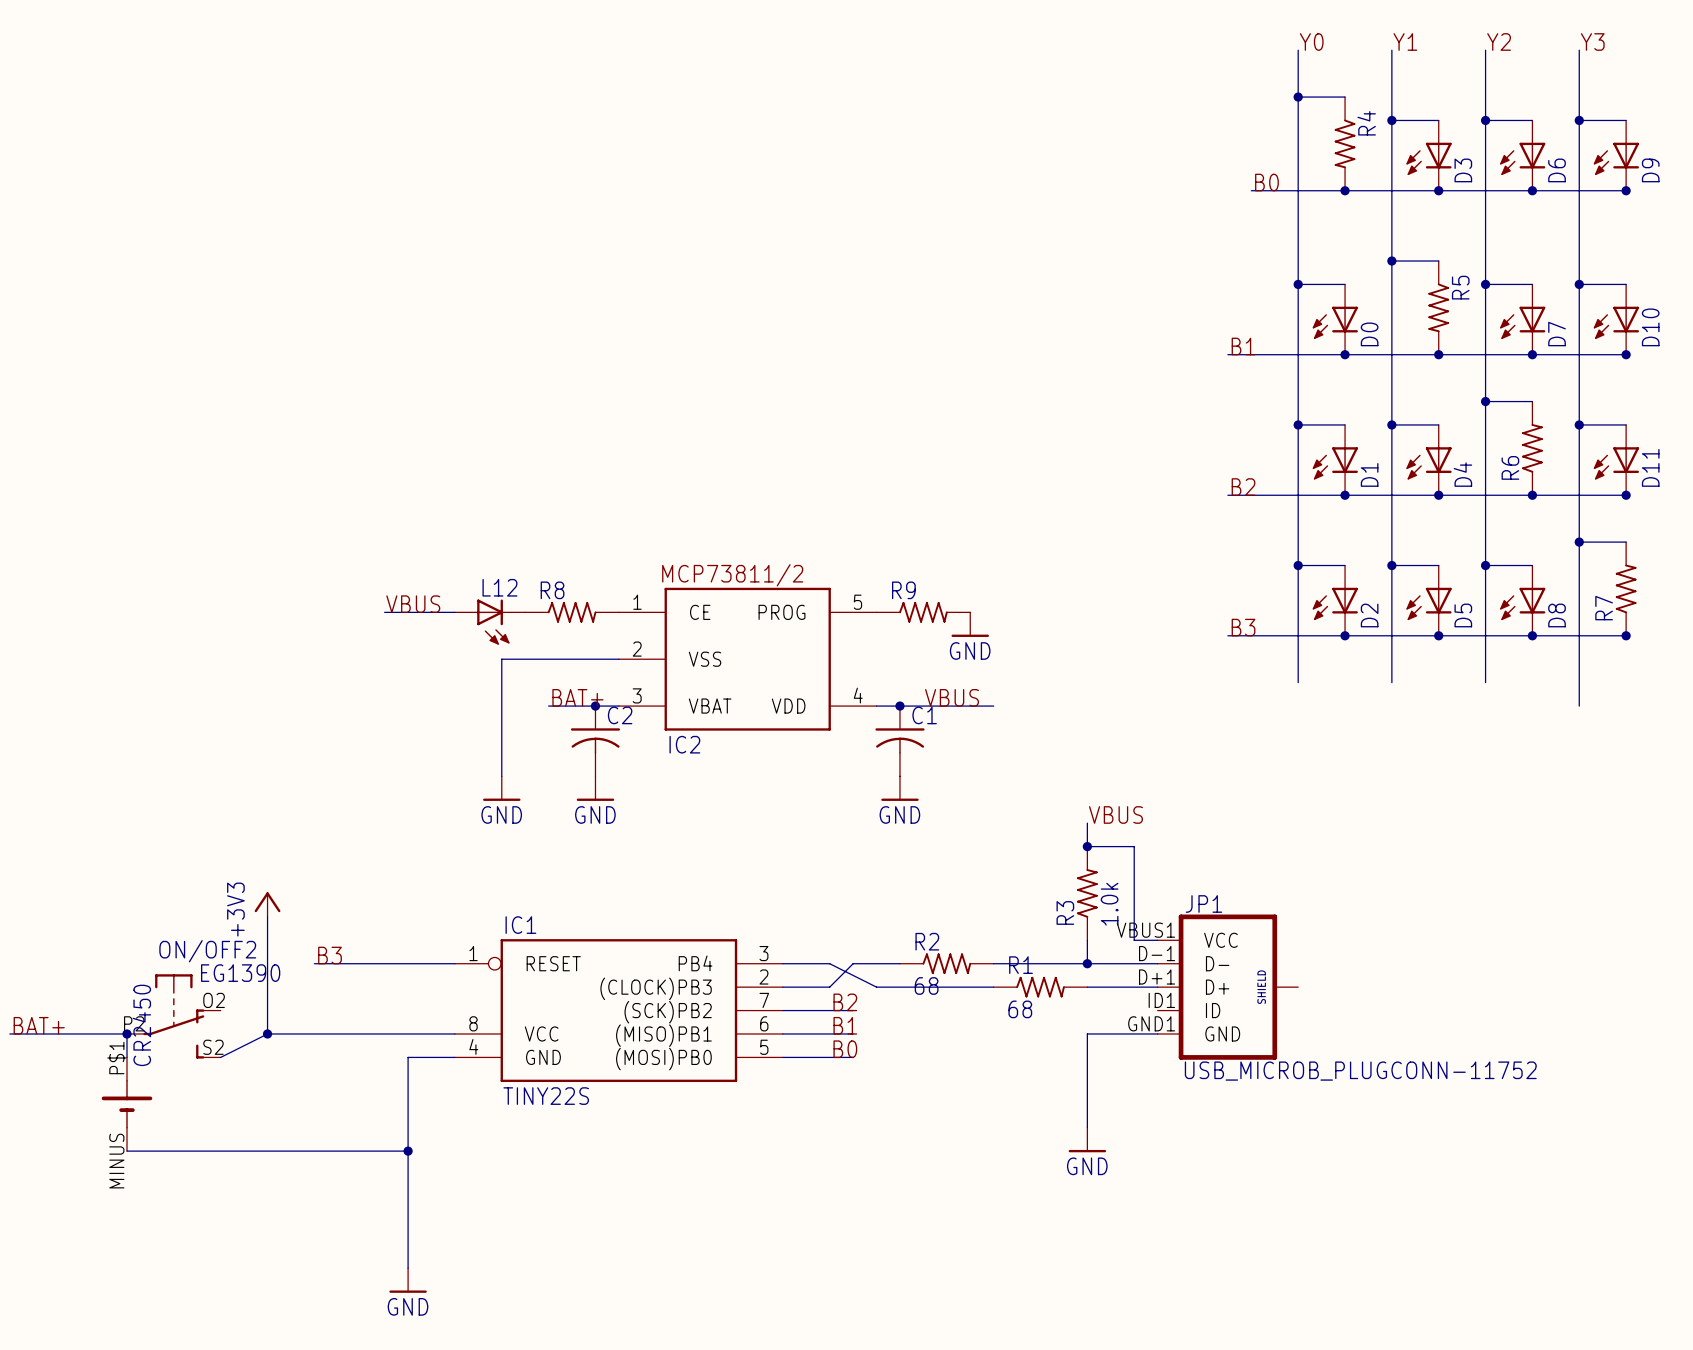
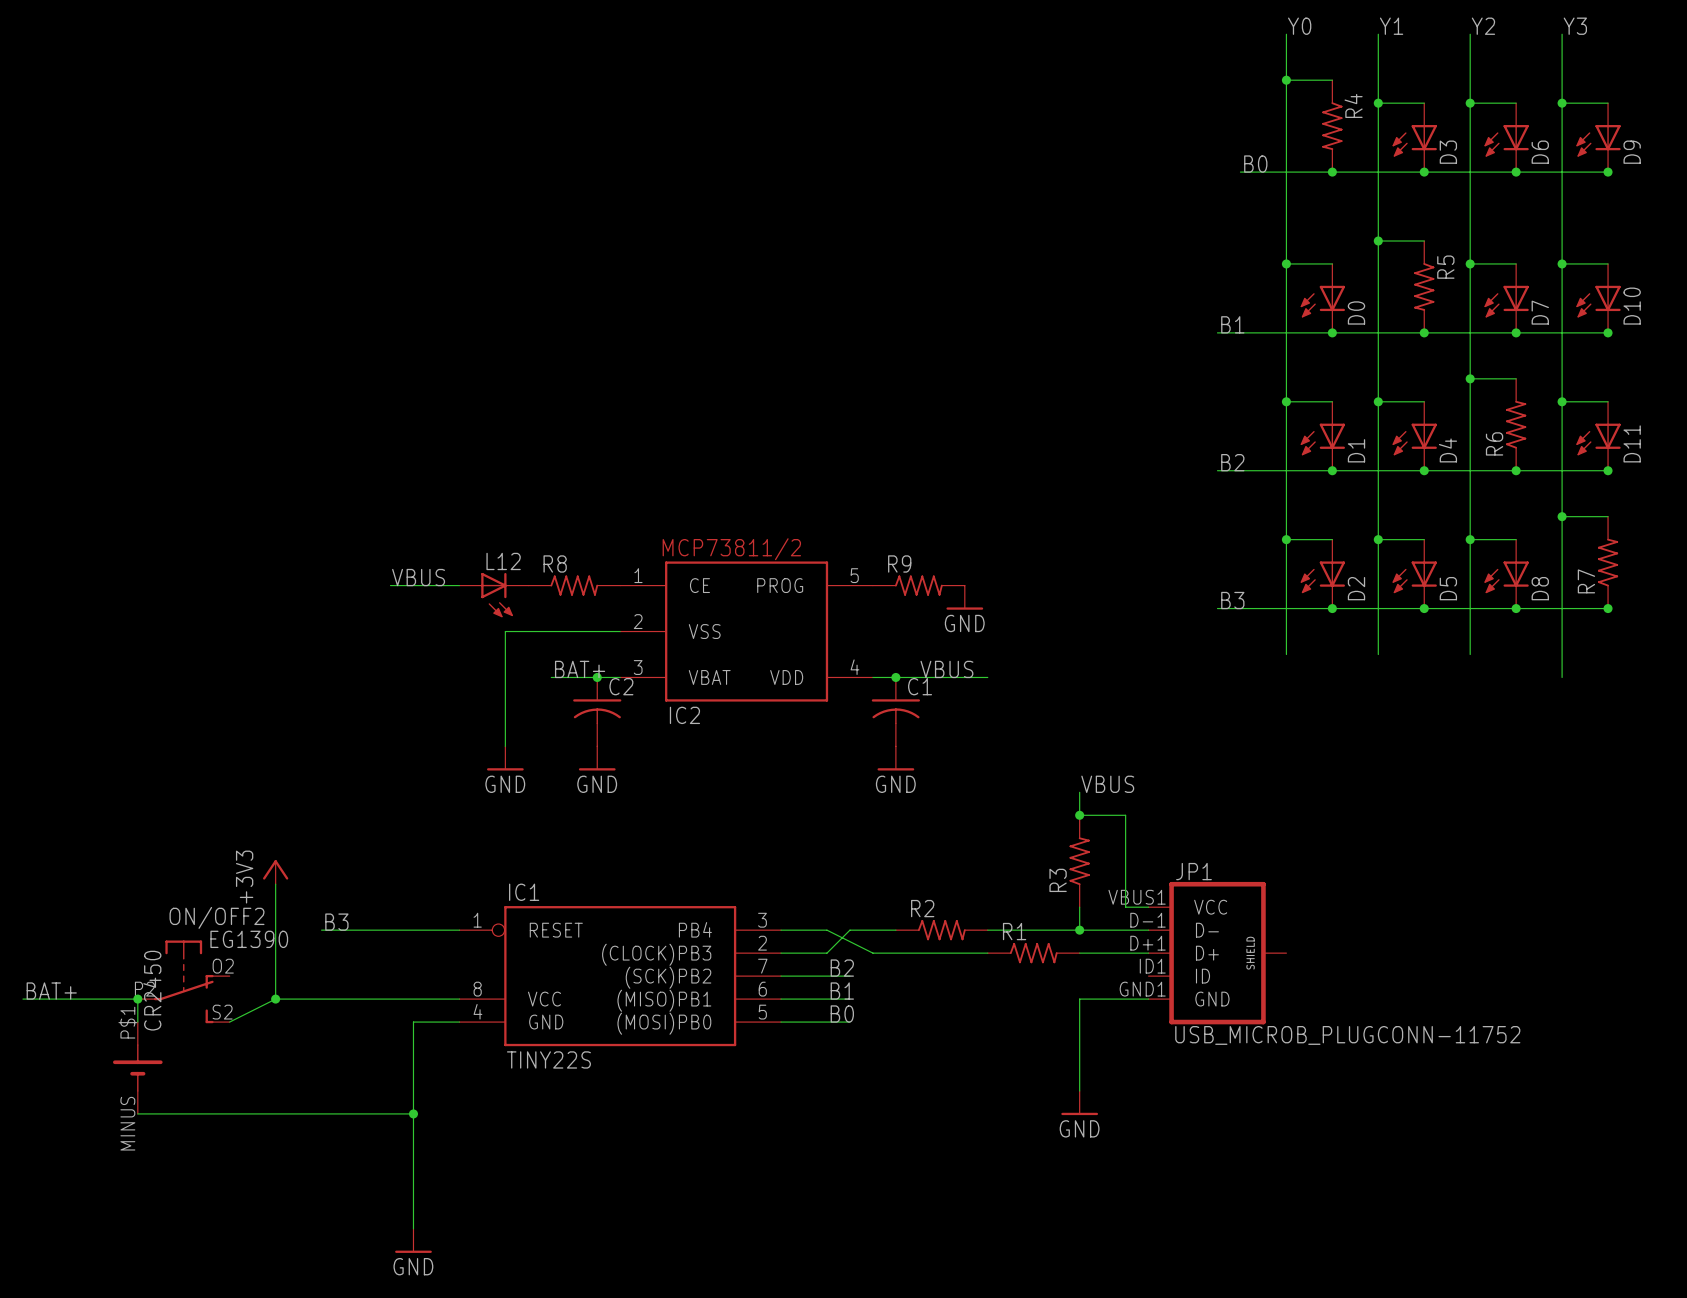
R3 value: 1.0k (1109, 904) -> none
R2 value: 68 (926, 985) -> none
R1 value: 68 (1020, 1009) -> none

